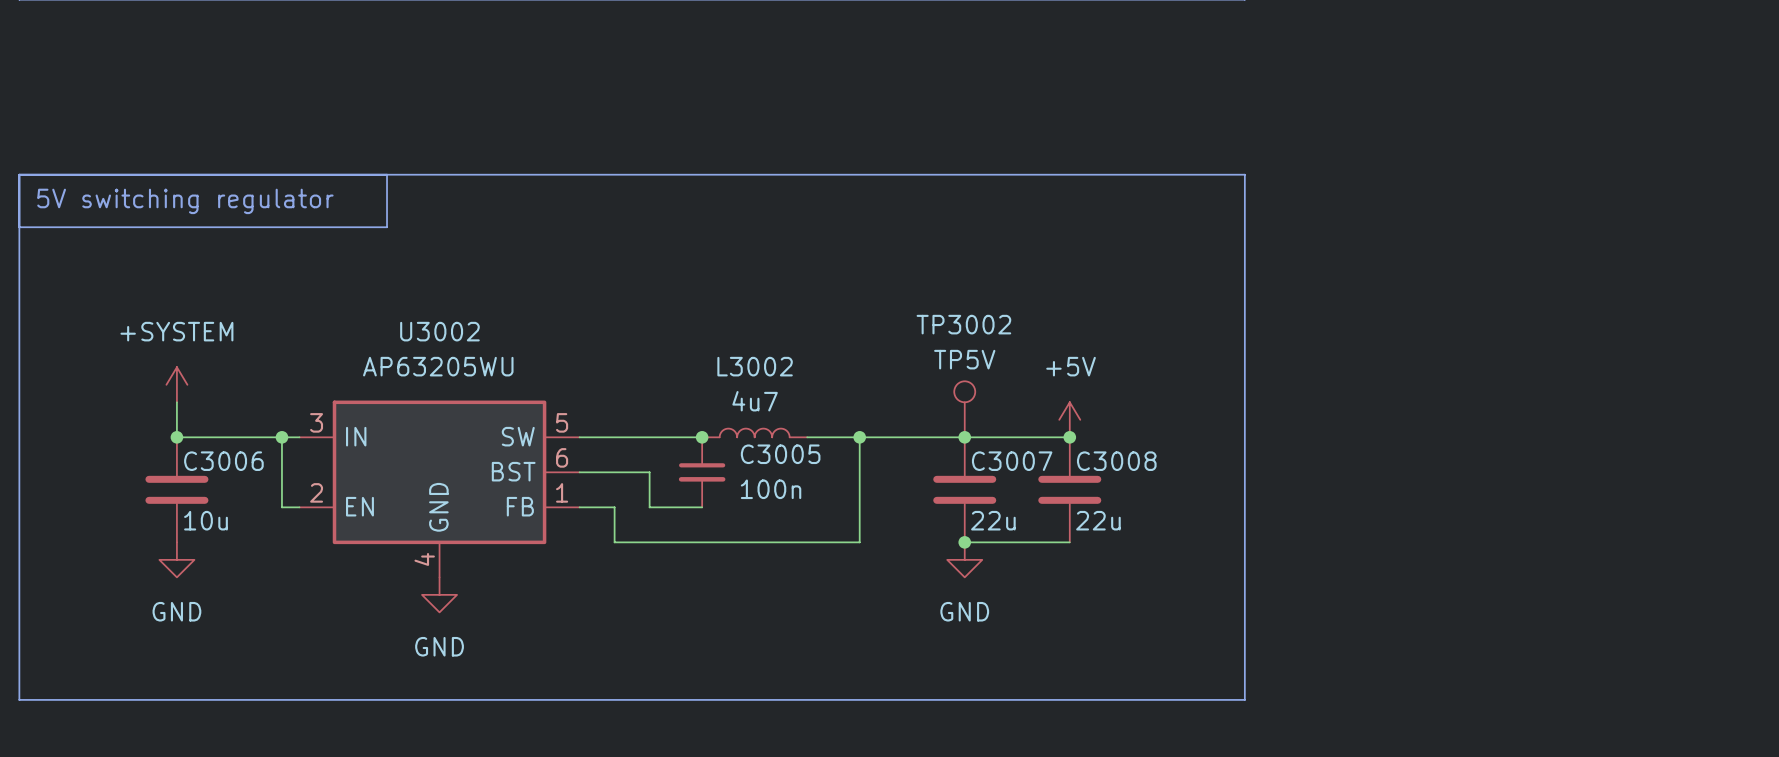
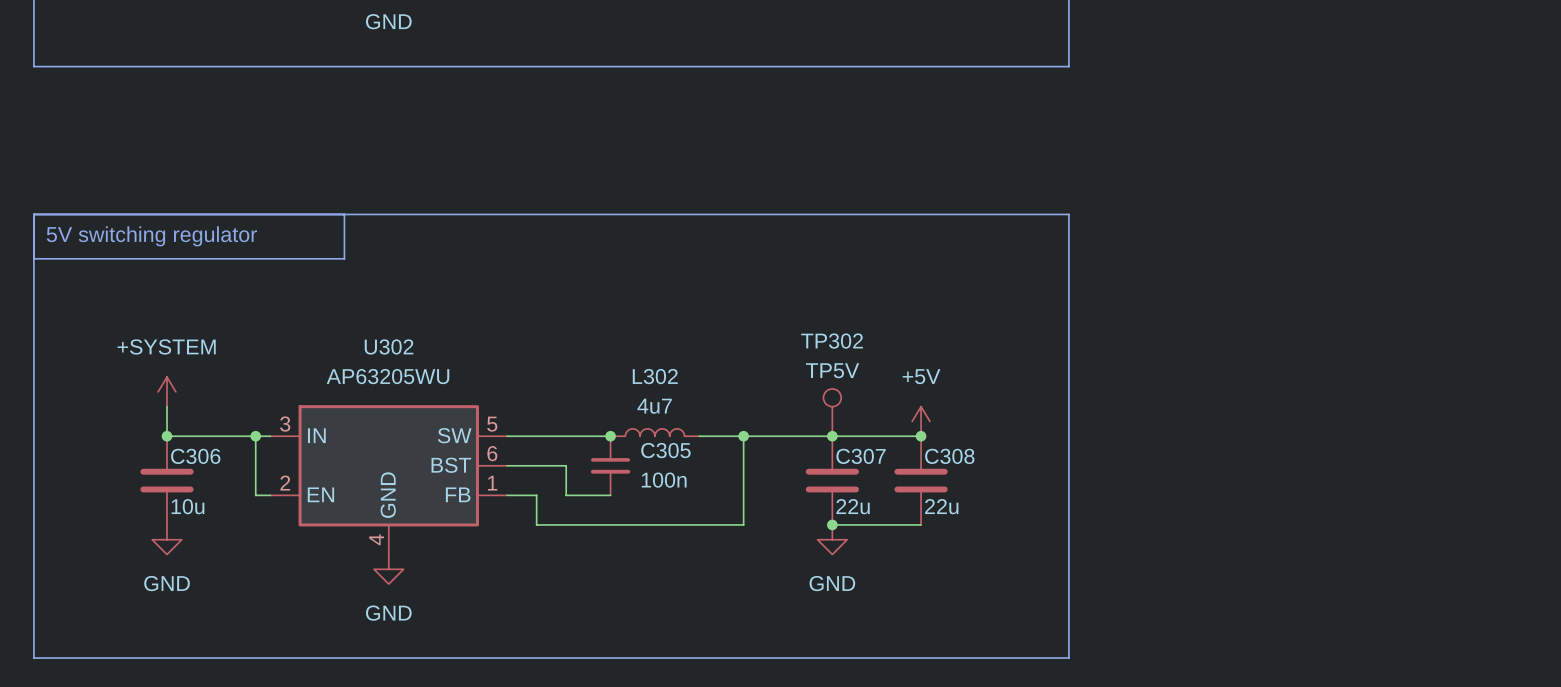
TP3002 name: TP3002 (963, 324) -> TP302 (832, 341)
U3002 name: U3002 (439, 331) -> U302 (389, 346)
L3002 name: L3002 (755, 366) -> L302 (655, 376)
C3005 name: C3005 (780, 454) -> C305 (665, 450)
C3006 name: C3006 (223, 461) -> C306 (195, 456)
C3007 name: C3007 (1012, 461) -> C307 (861, 456)
C3008 name: C3008 (1116, 461) -> C308 (949, 456)

